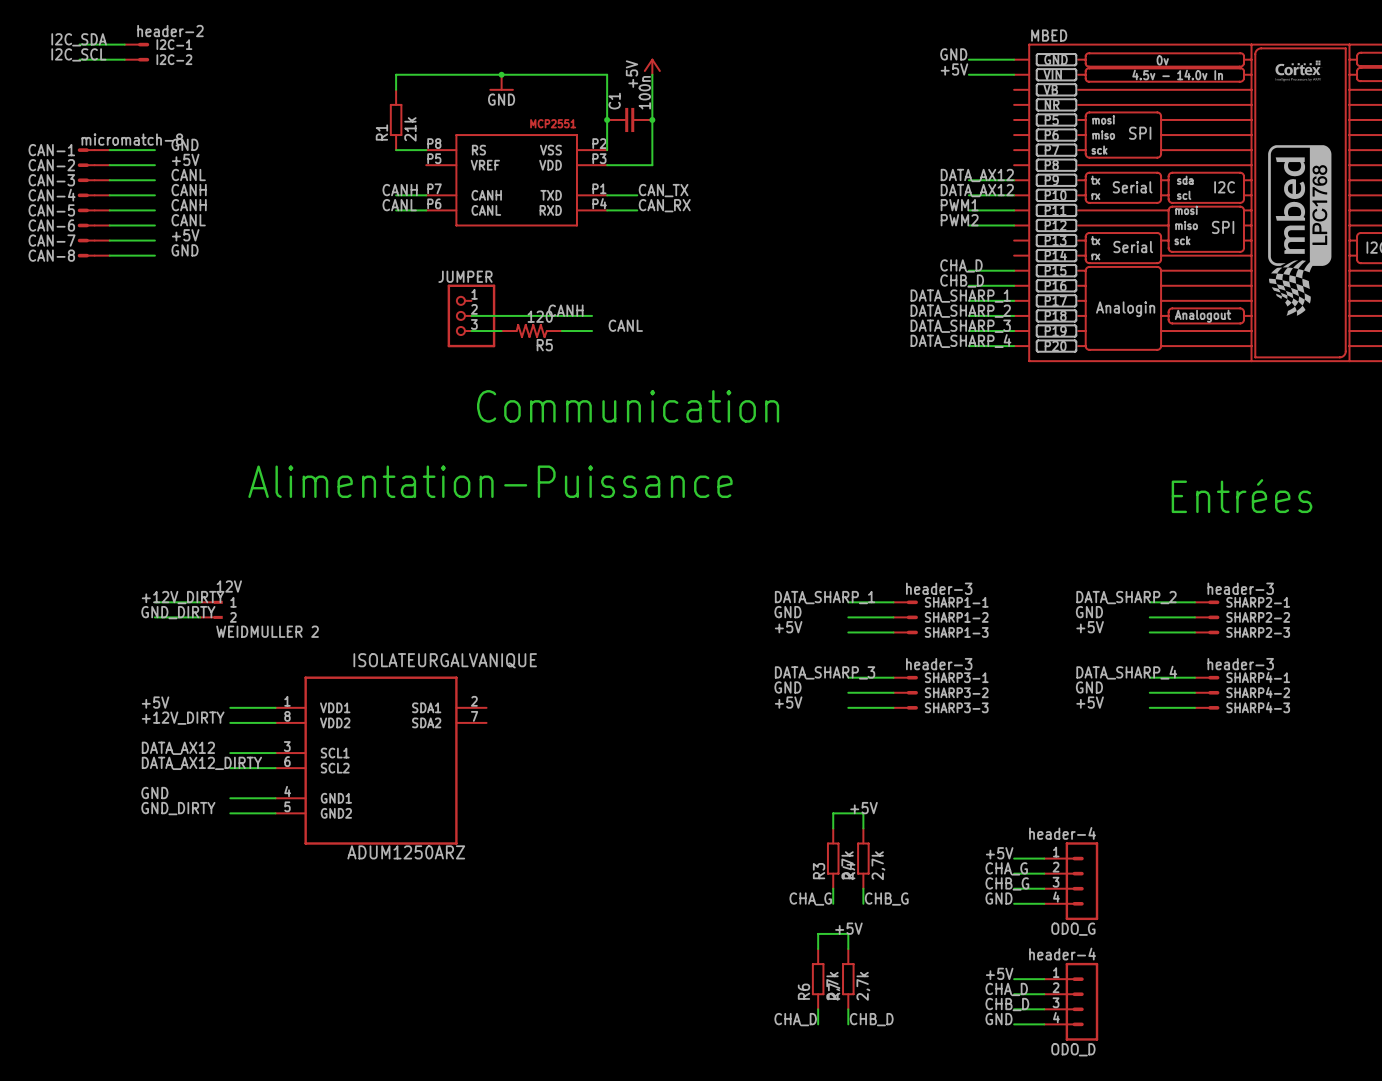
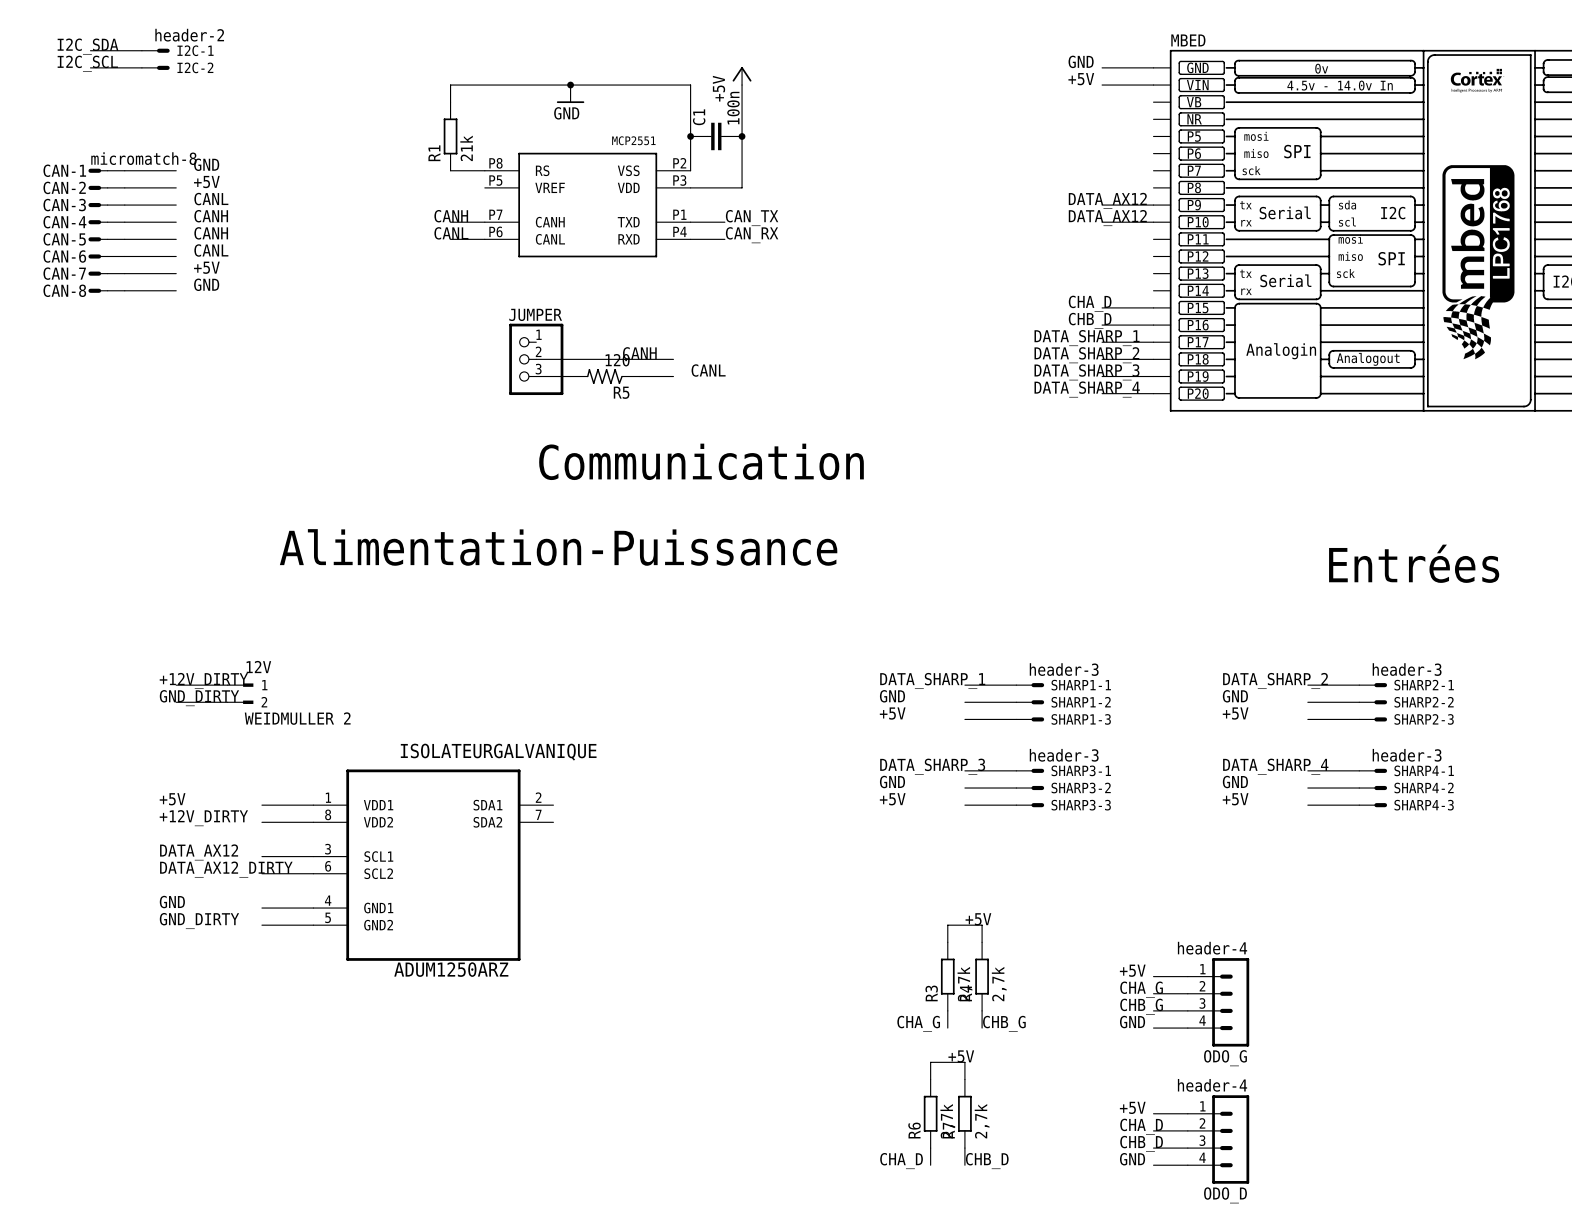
label: PWM1 (959, 205) -> none
wire: (968, 210) (1014, 210) -> none
label: PWM2 (959, 220) -> none
wire: (968, 225) (1014, 225) -> none

